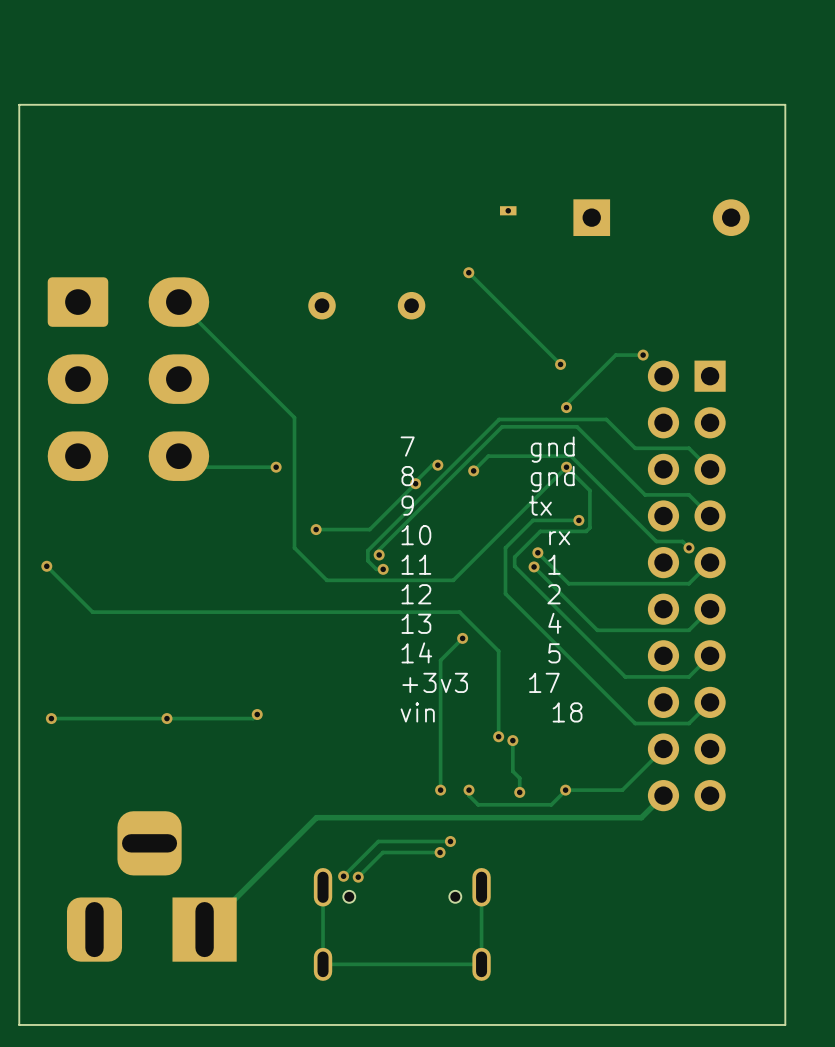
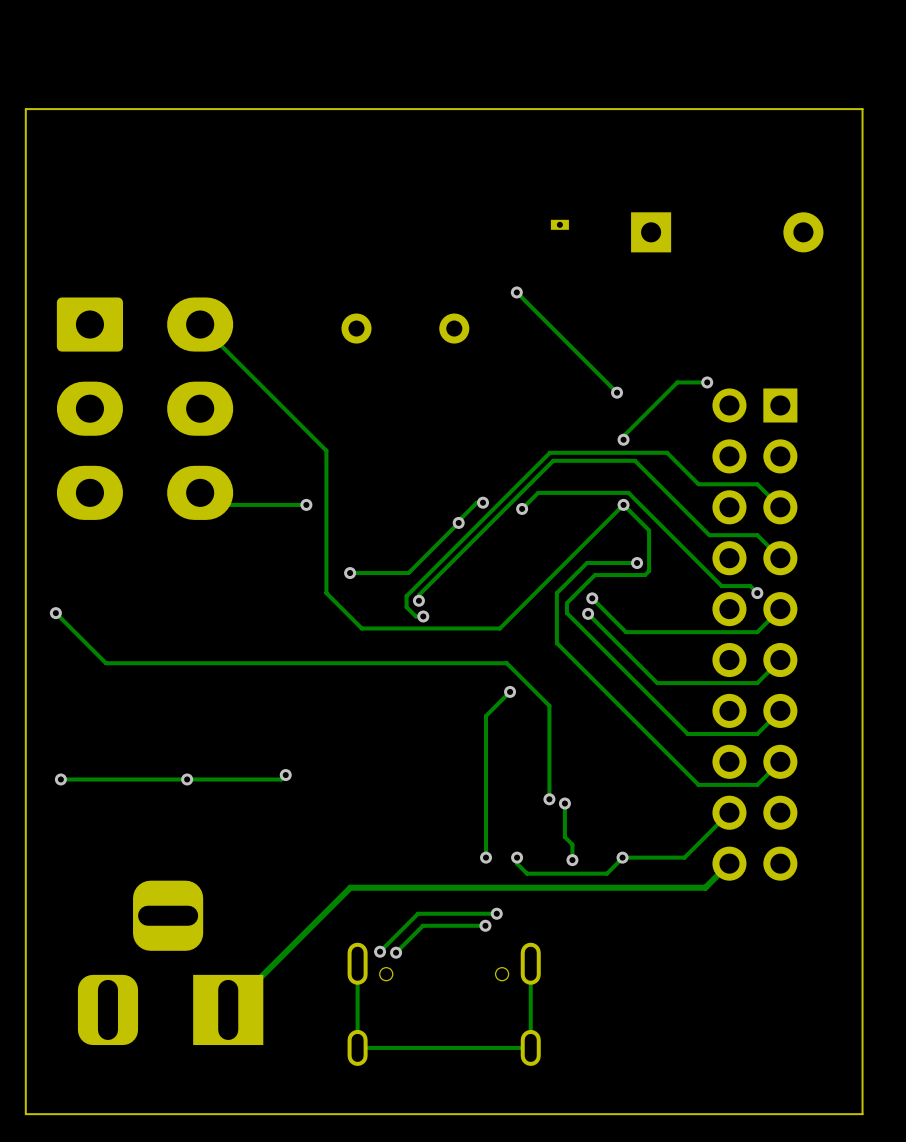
text: 7 gnd (487, 449) -> none
text: 8 gnd (488, 479) -> none
text: 9 tx (476, 505) -> none
text: 10 rx (485, 535) -> none
text: 11 1 (481, 564) -> none
text: 12 2 (481, 594) -> none
text: 13 4 (481, 623) -> none
text: 14 5 (481, 652) -> none
text: +3v3 17 (481, 682) -> none
text: vin 18 (491, 712) -> none

